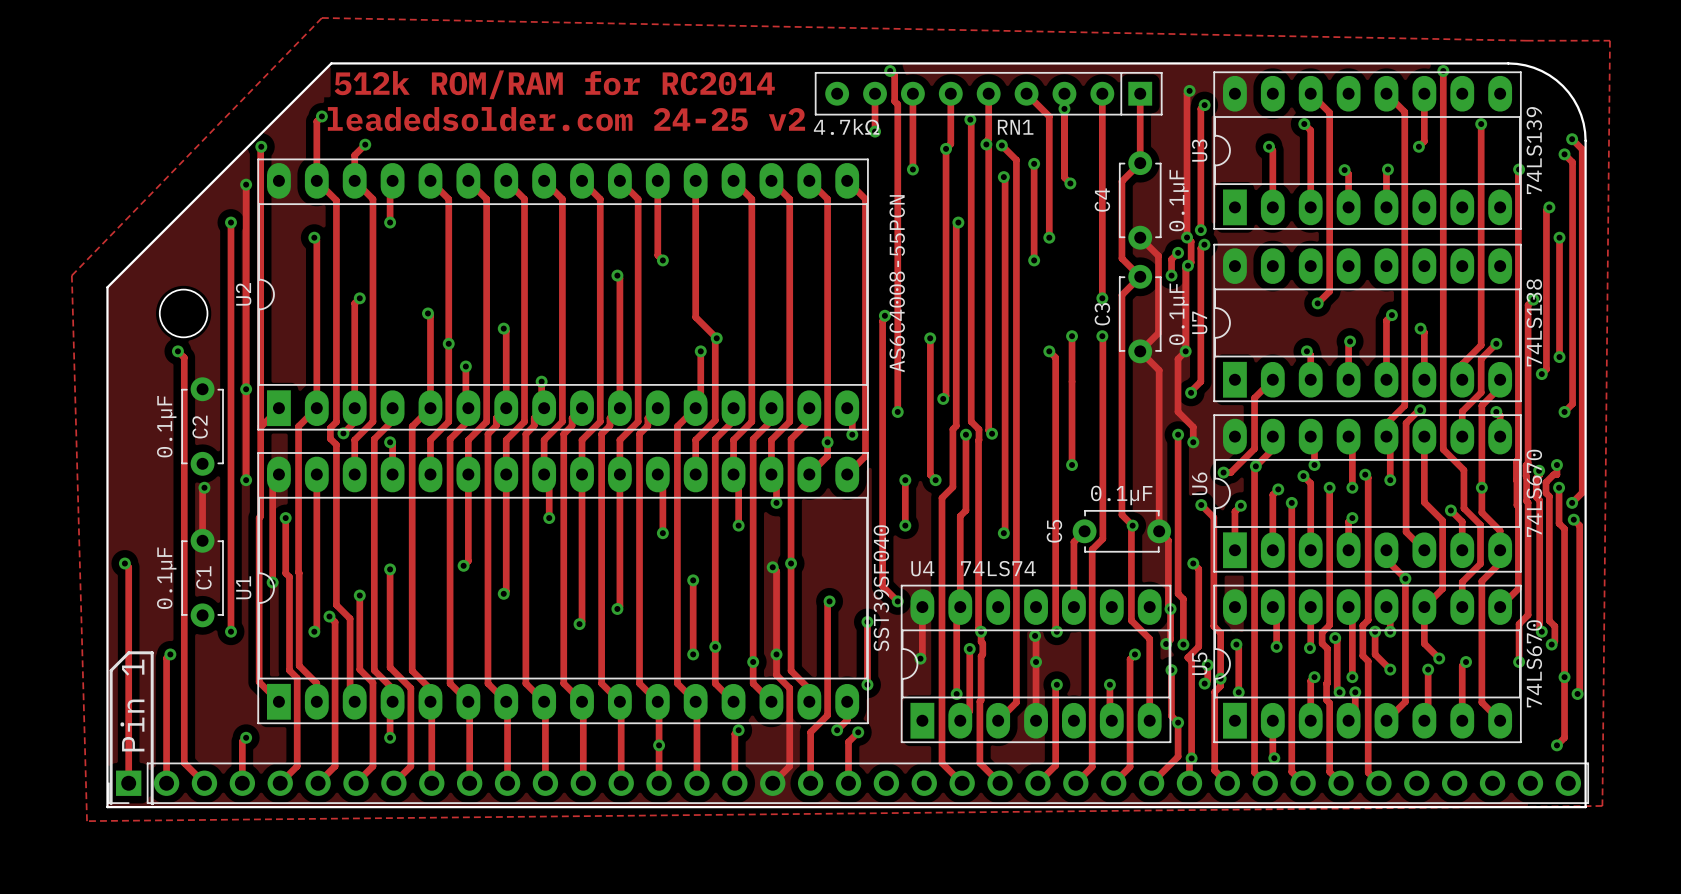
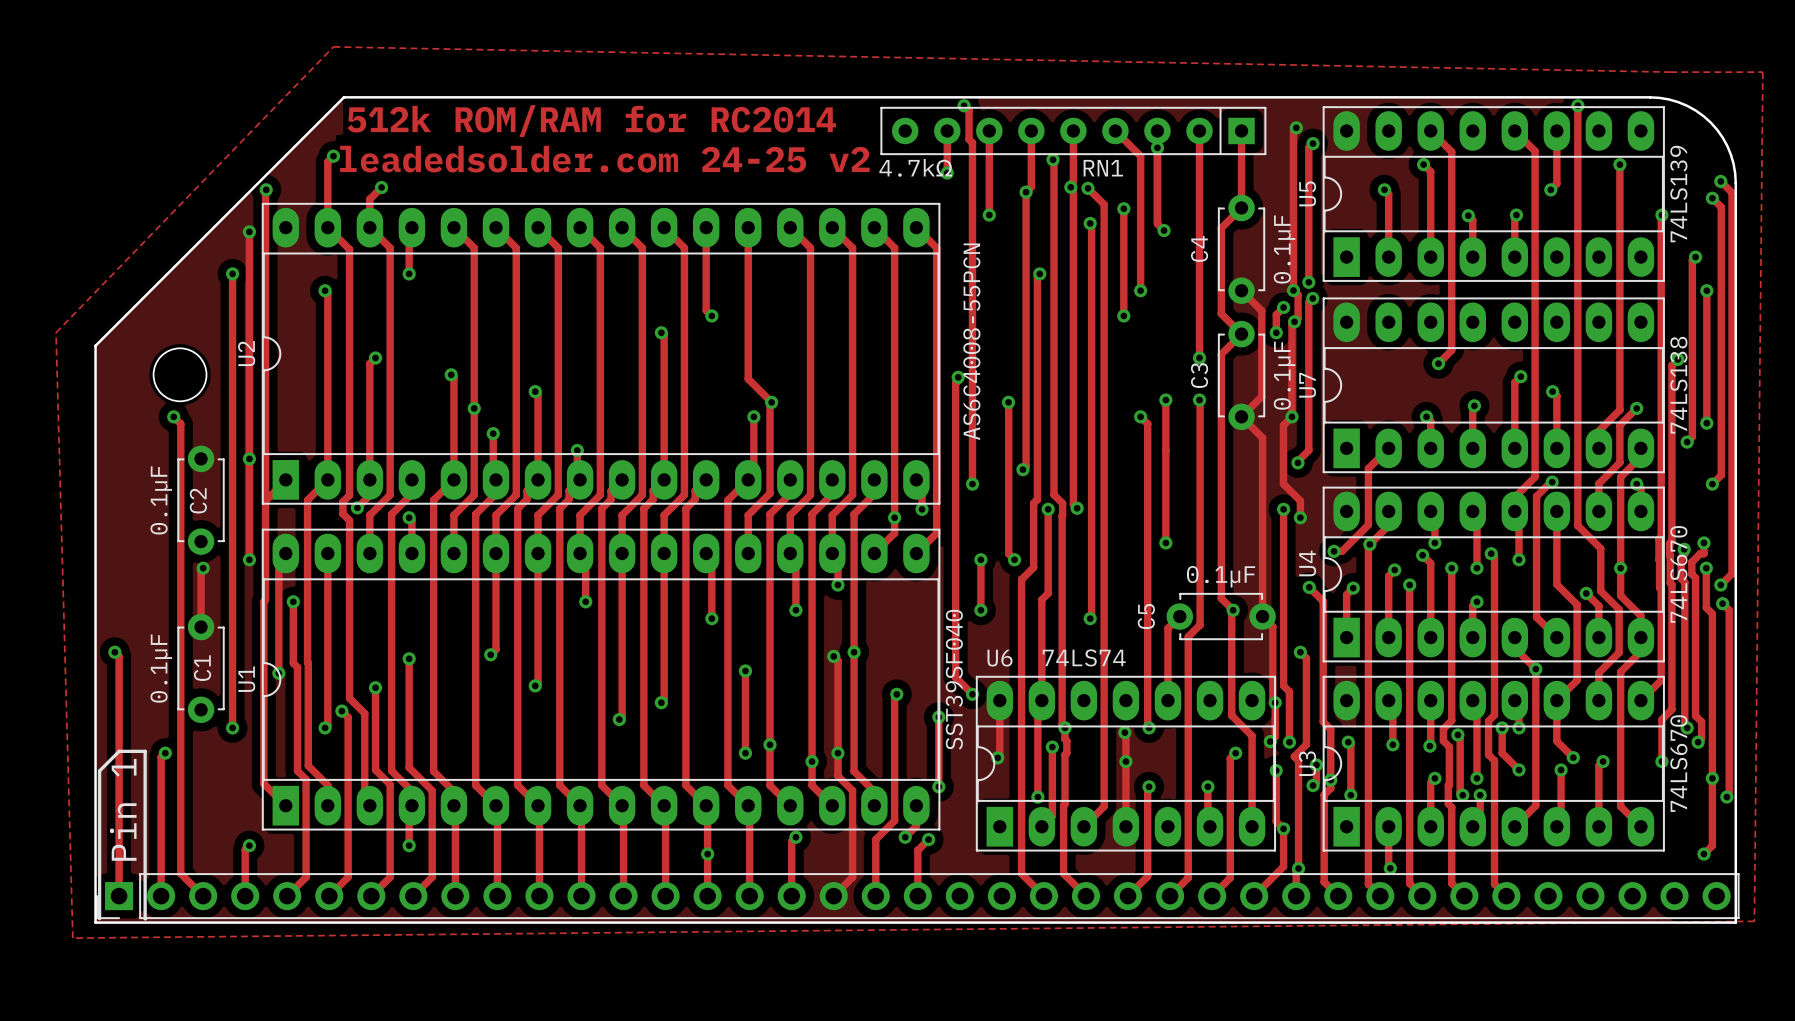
U3 name: U3 (1199, 150) -> U5 (1307, 193)
U6 name: U6 (1199, 483) -> U4 (1307, 563)
U4 name: U4 (922, 568) -> U6 (1000, 658)
U5 name: U5 (1199, 663) -> U3 (1307, 763)

